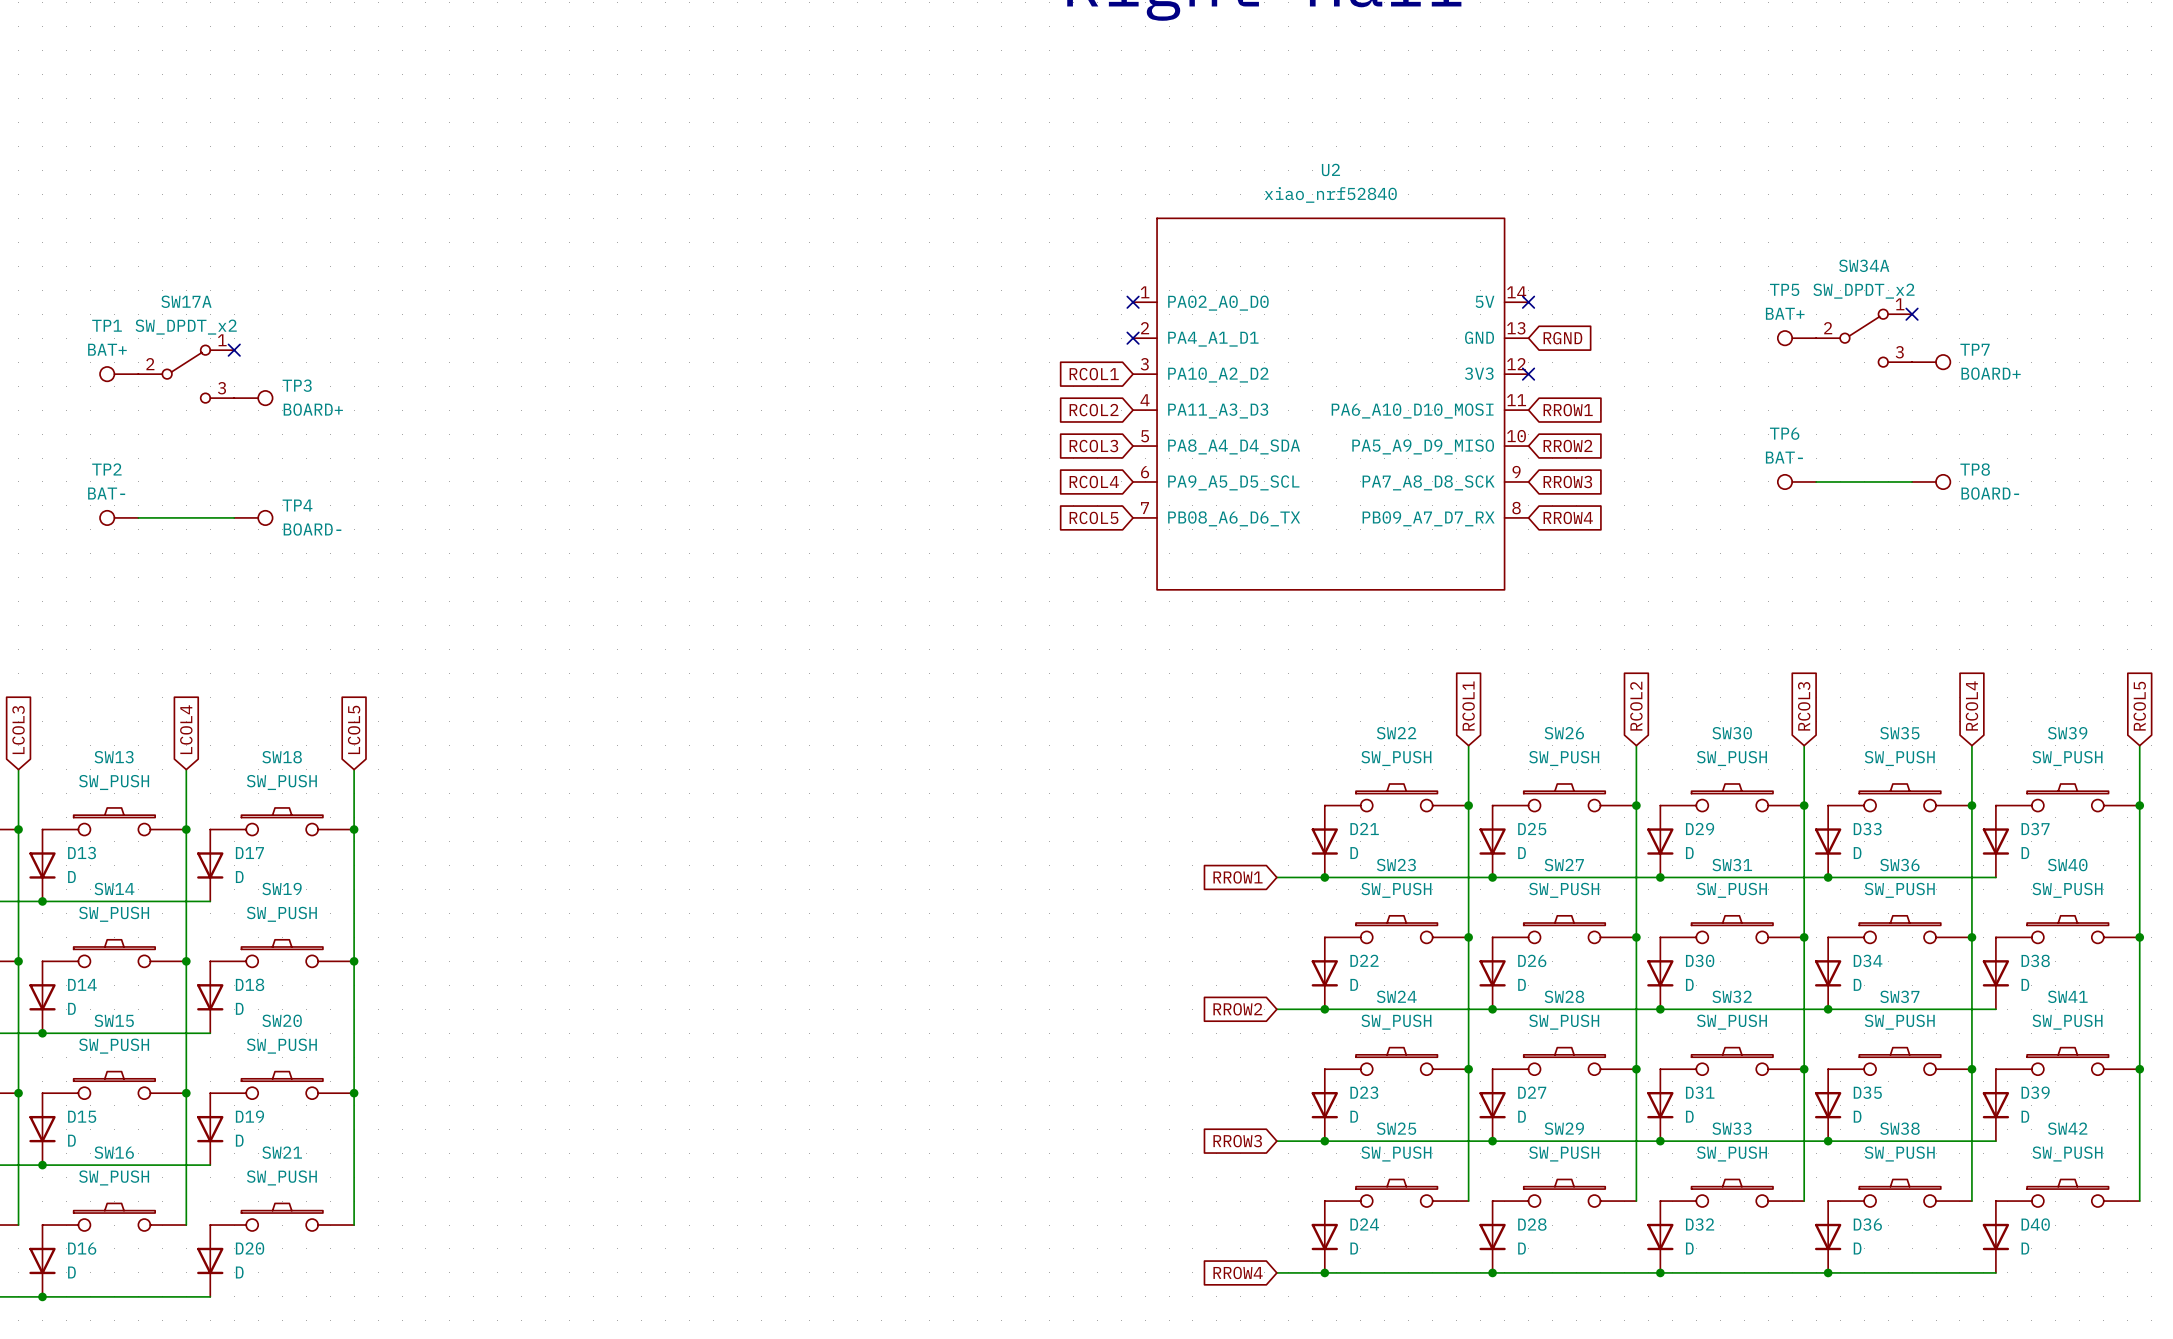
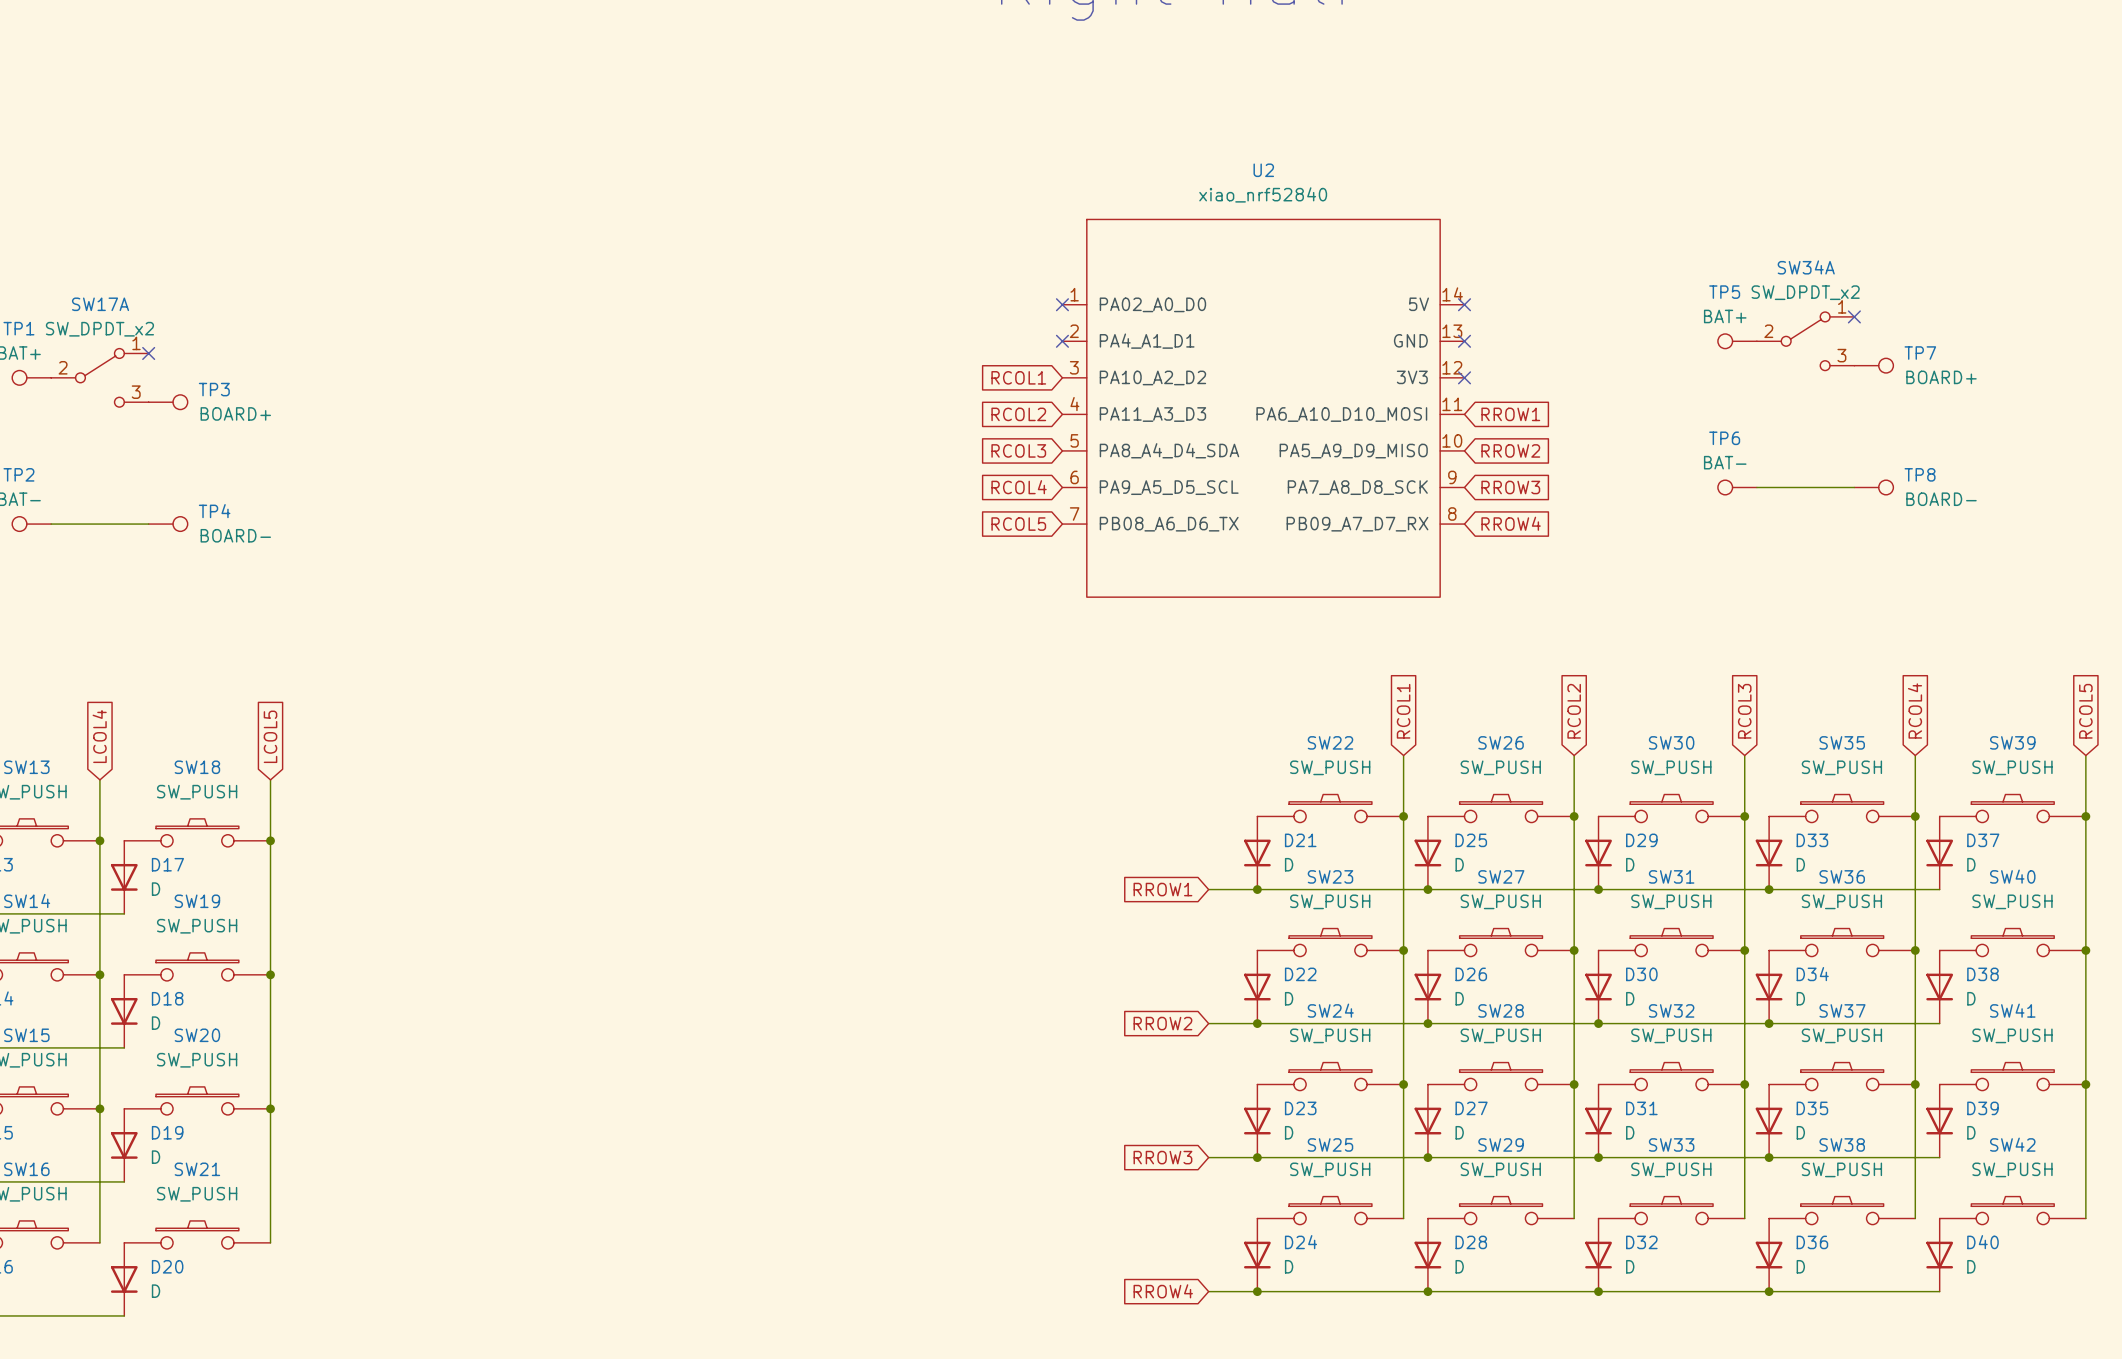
no-connect mark: none -> (1464, 341)
global label: RGND (1562, 338) -> none

